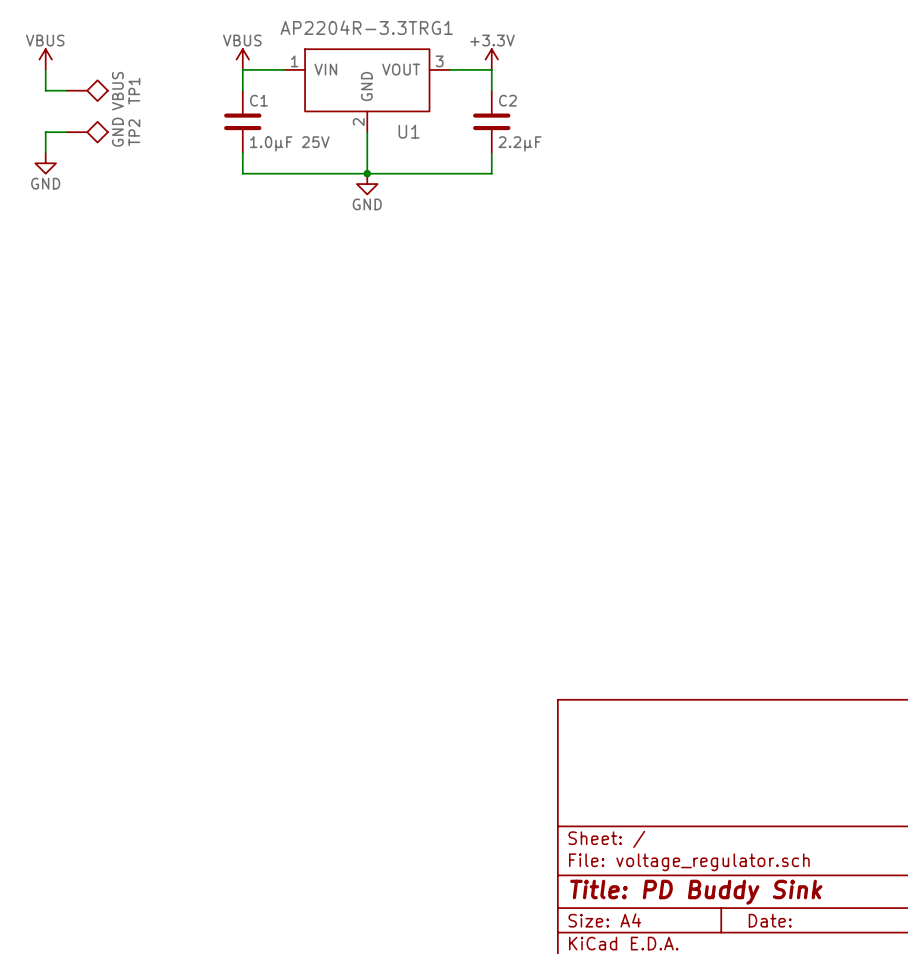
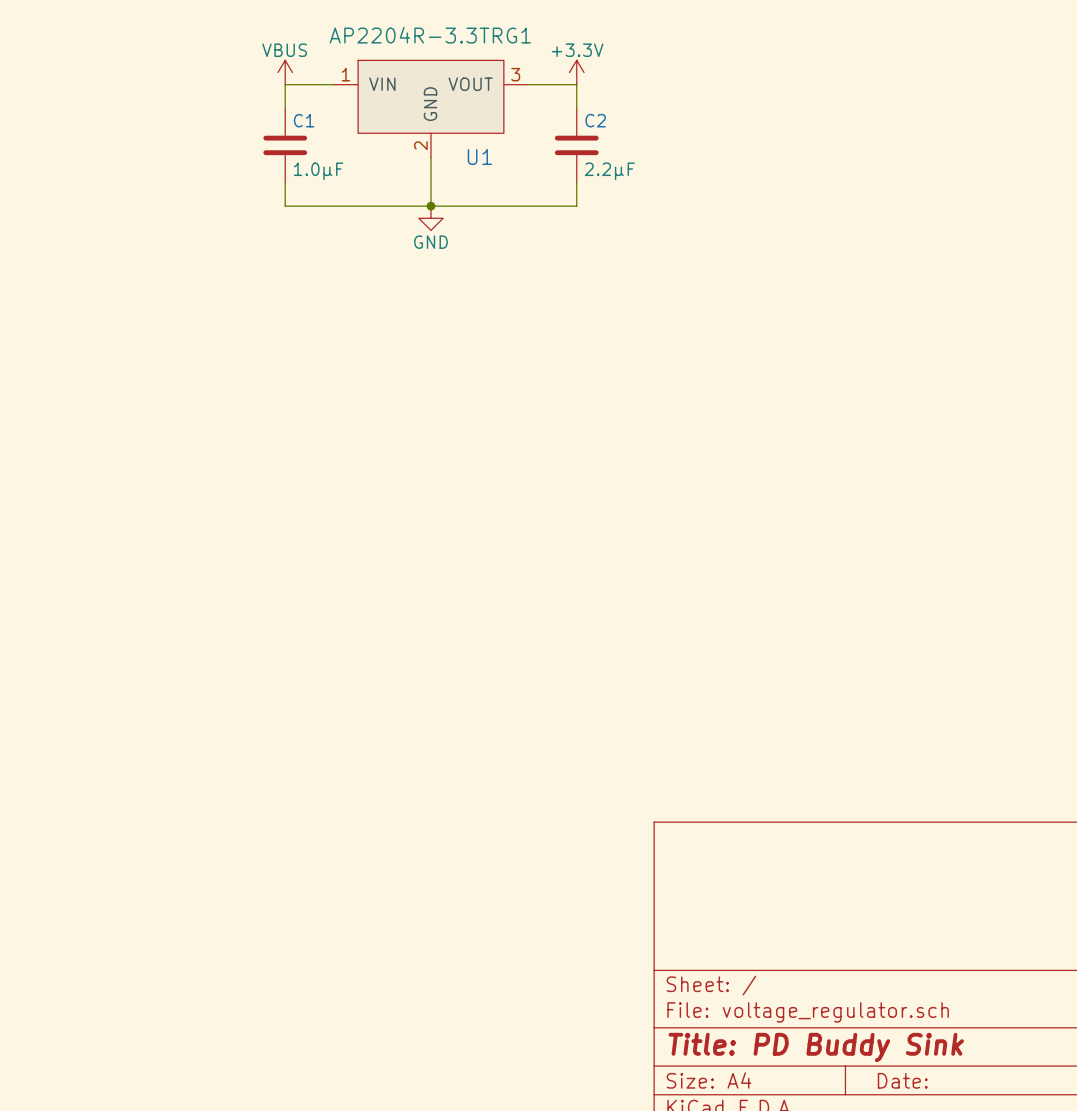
power symbol: VBUS (45, 59) -> none
wire: (45, 69) (45, 90) (66, 90) -> none
TP1: VBUS (87, 90) -> none
wire: (66, 132) (45, 132) (45, 152) -> none
TP2: GND (87, 132) -> none
C1 value: 1.0μF 25V (289, 143) -> 1.0μF (318, 171)
power symbol: GND (45, 163) -> none

